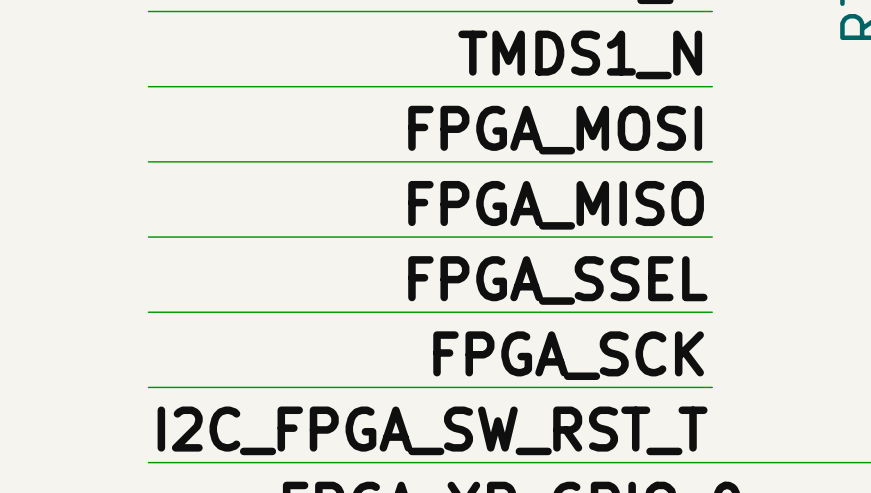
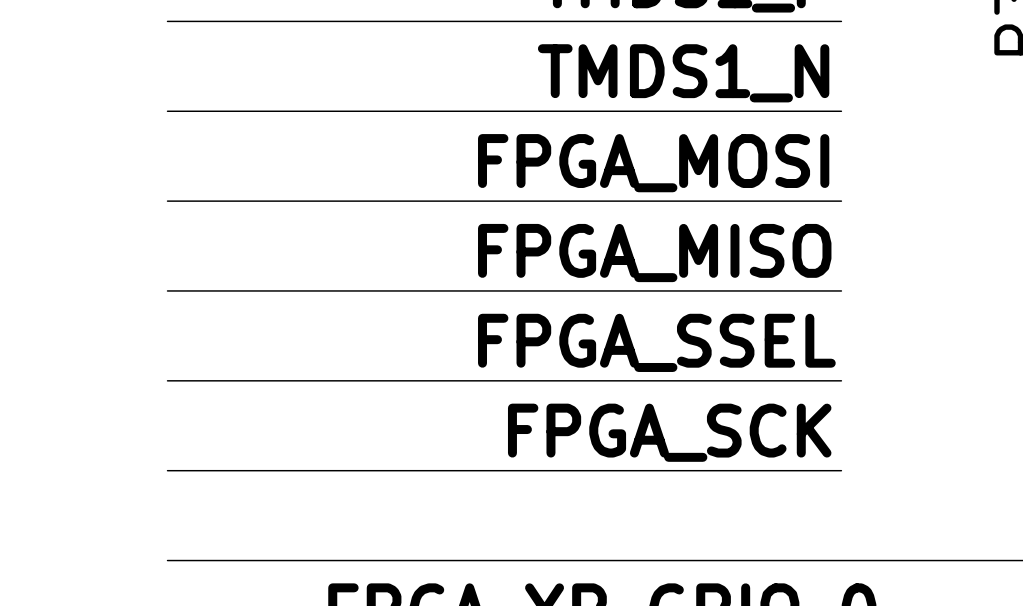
label: I2C_FPGA_SW_RST_T (432, 430) -> none

